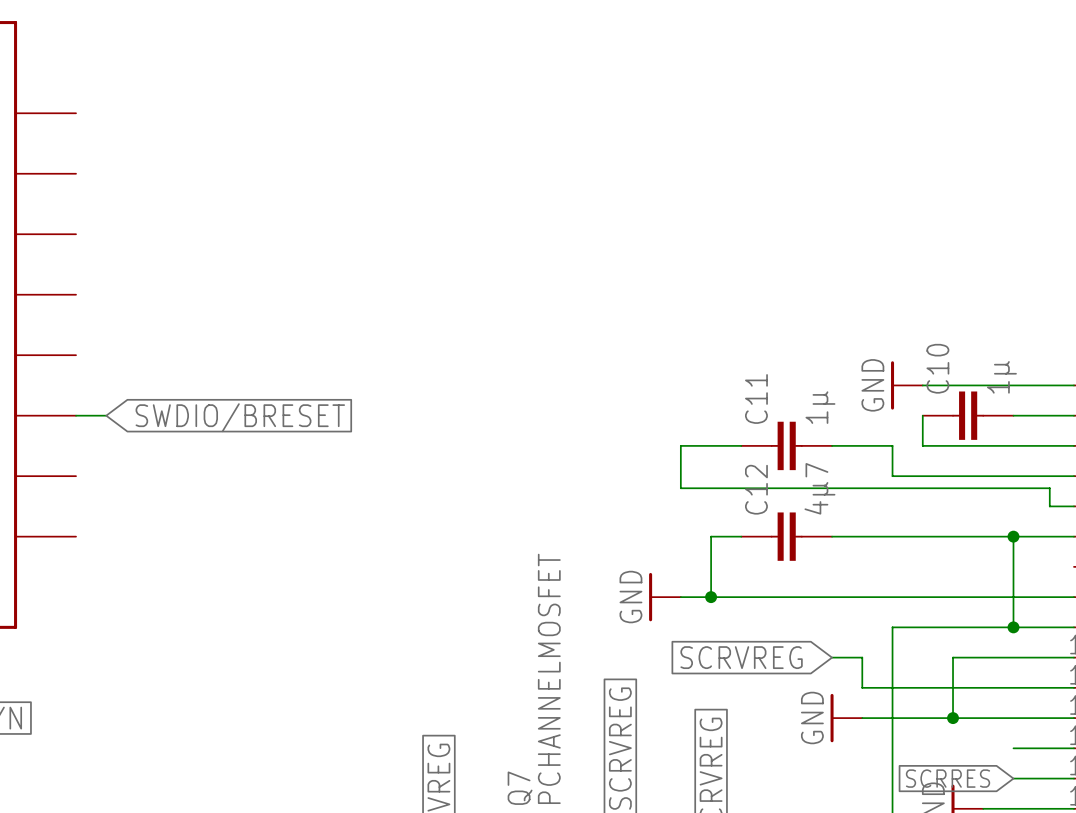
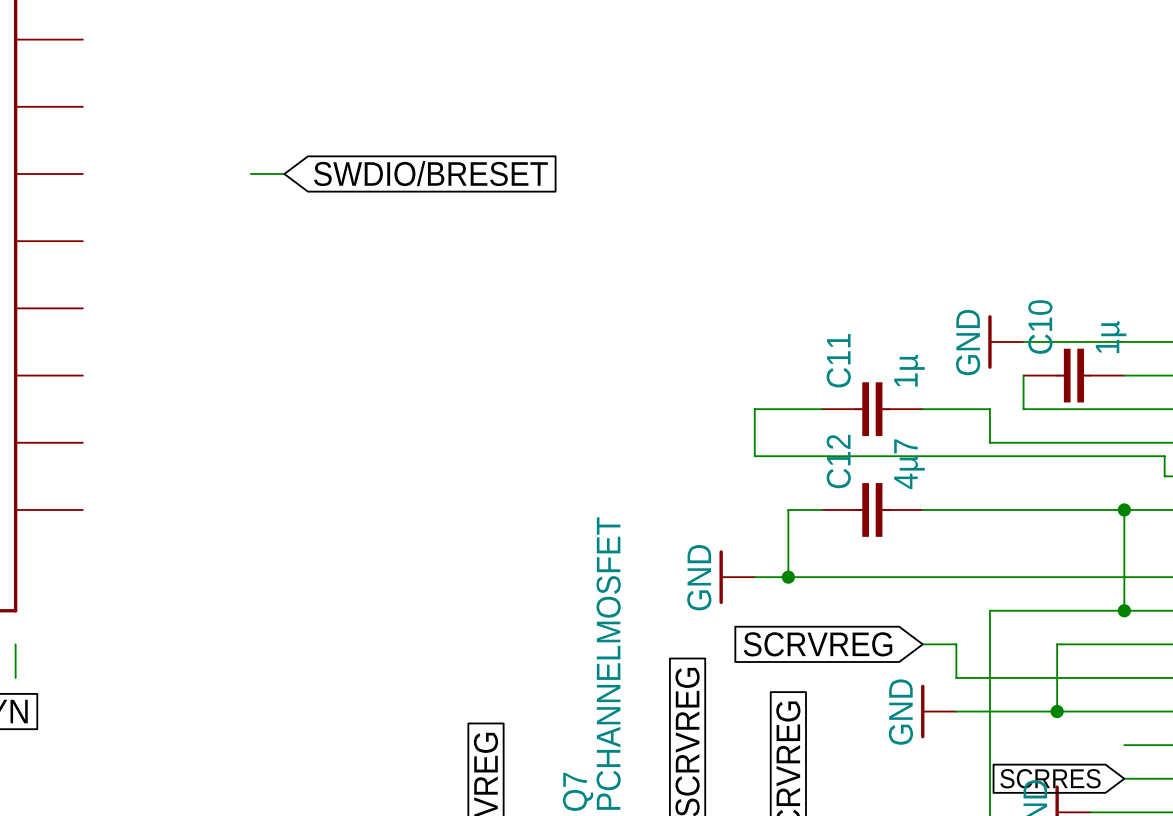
wire: (76, 415) (106, 415) -> (250, 173) (284, 173)
global label position: SWDIO/BRESET (240, 417) -> SWDIO/BRESET (430, 173)
wire: none -> (15, 644) (15, 677)

